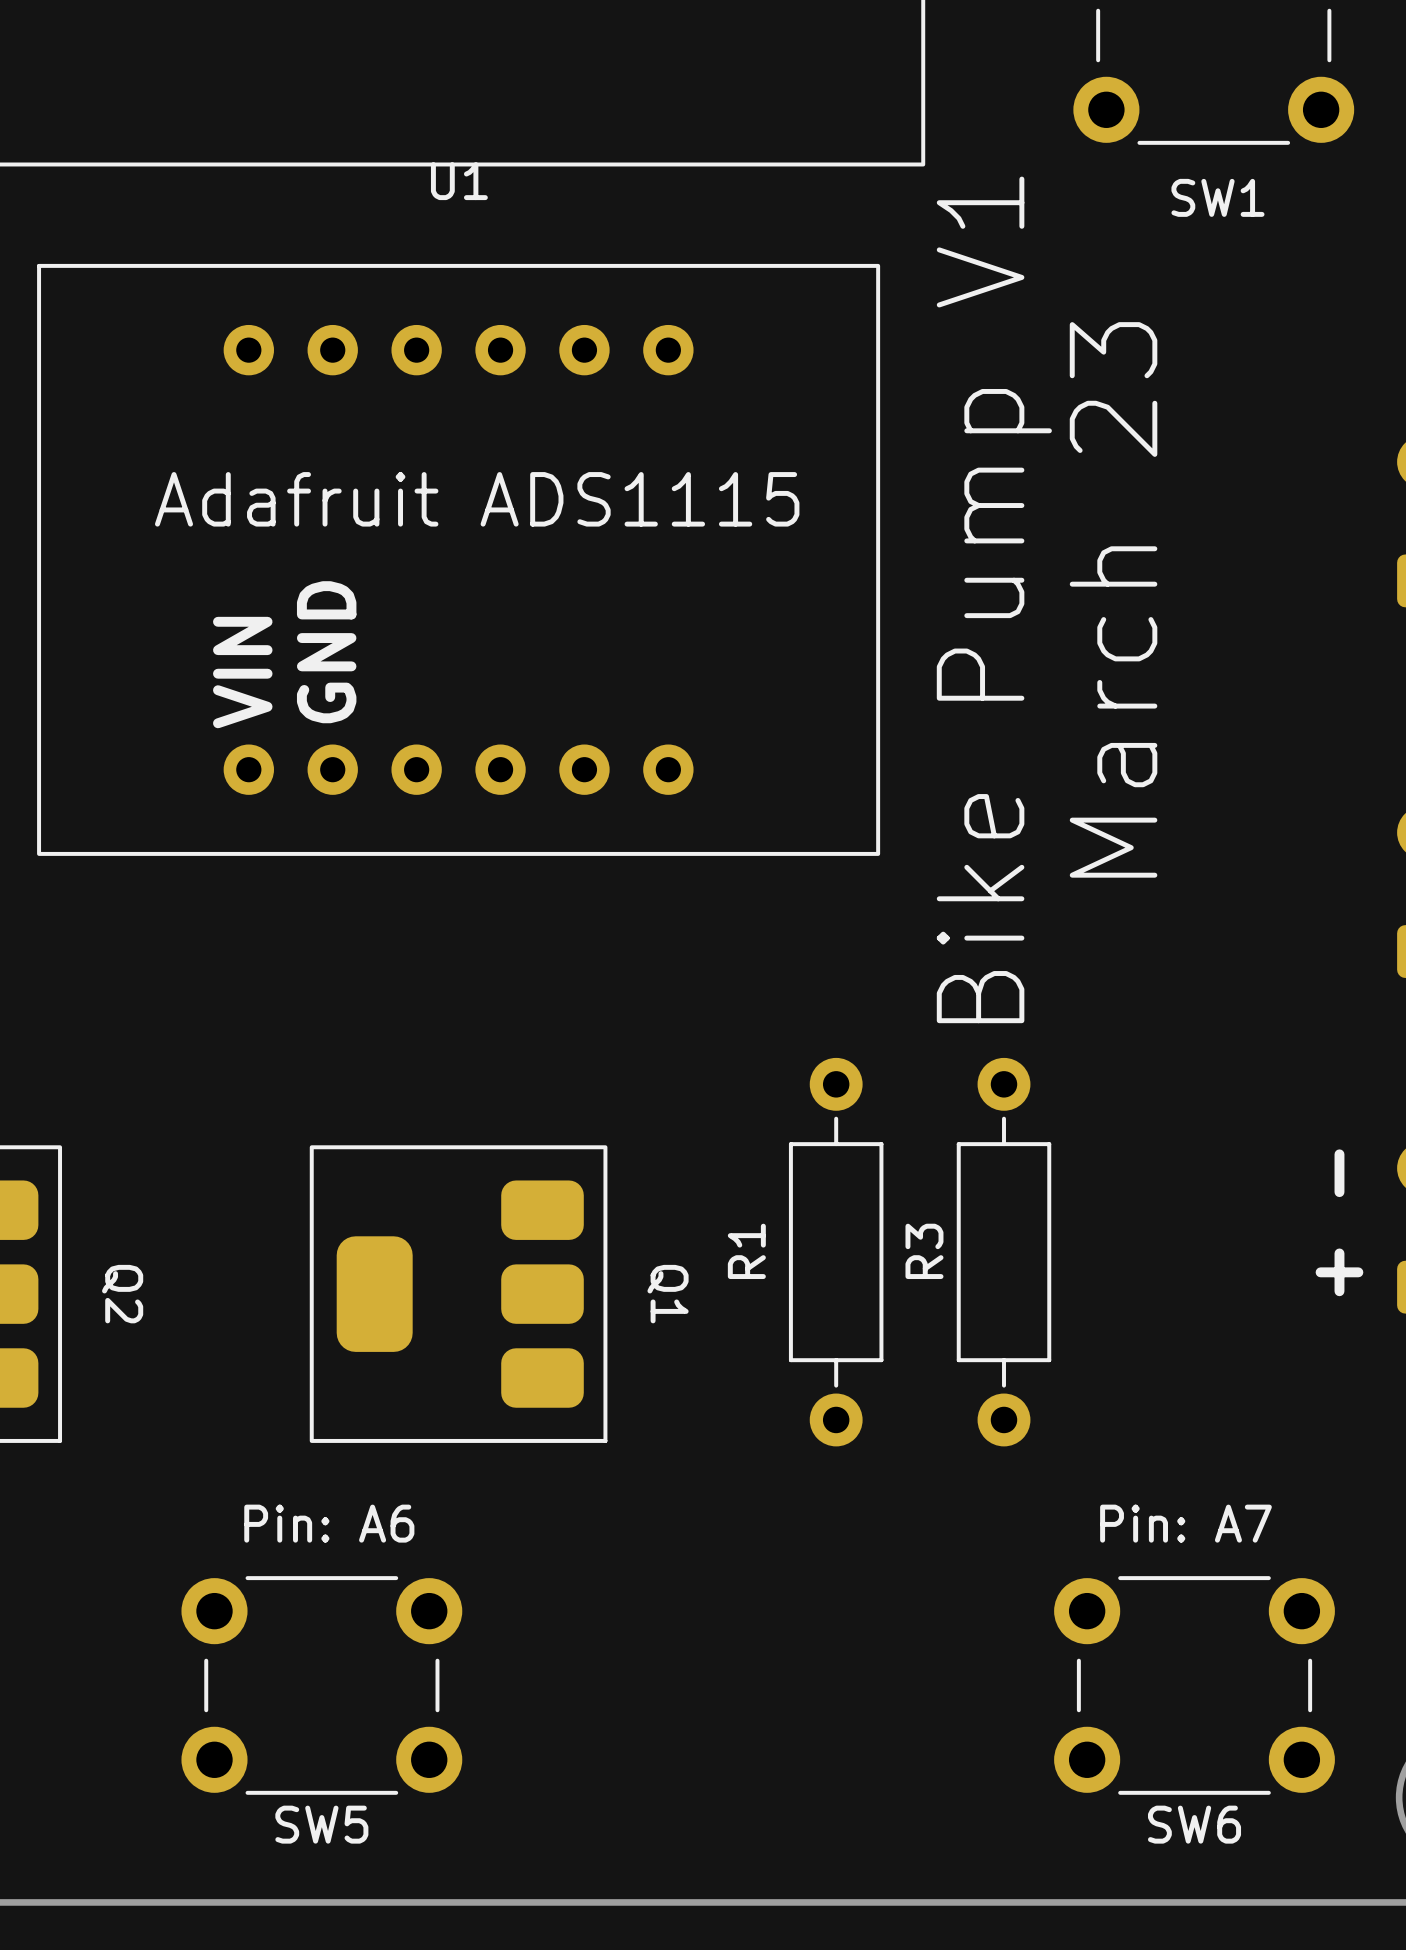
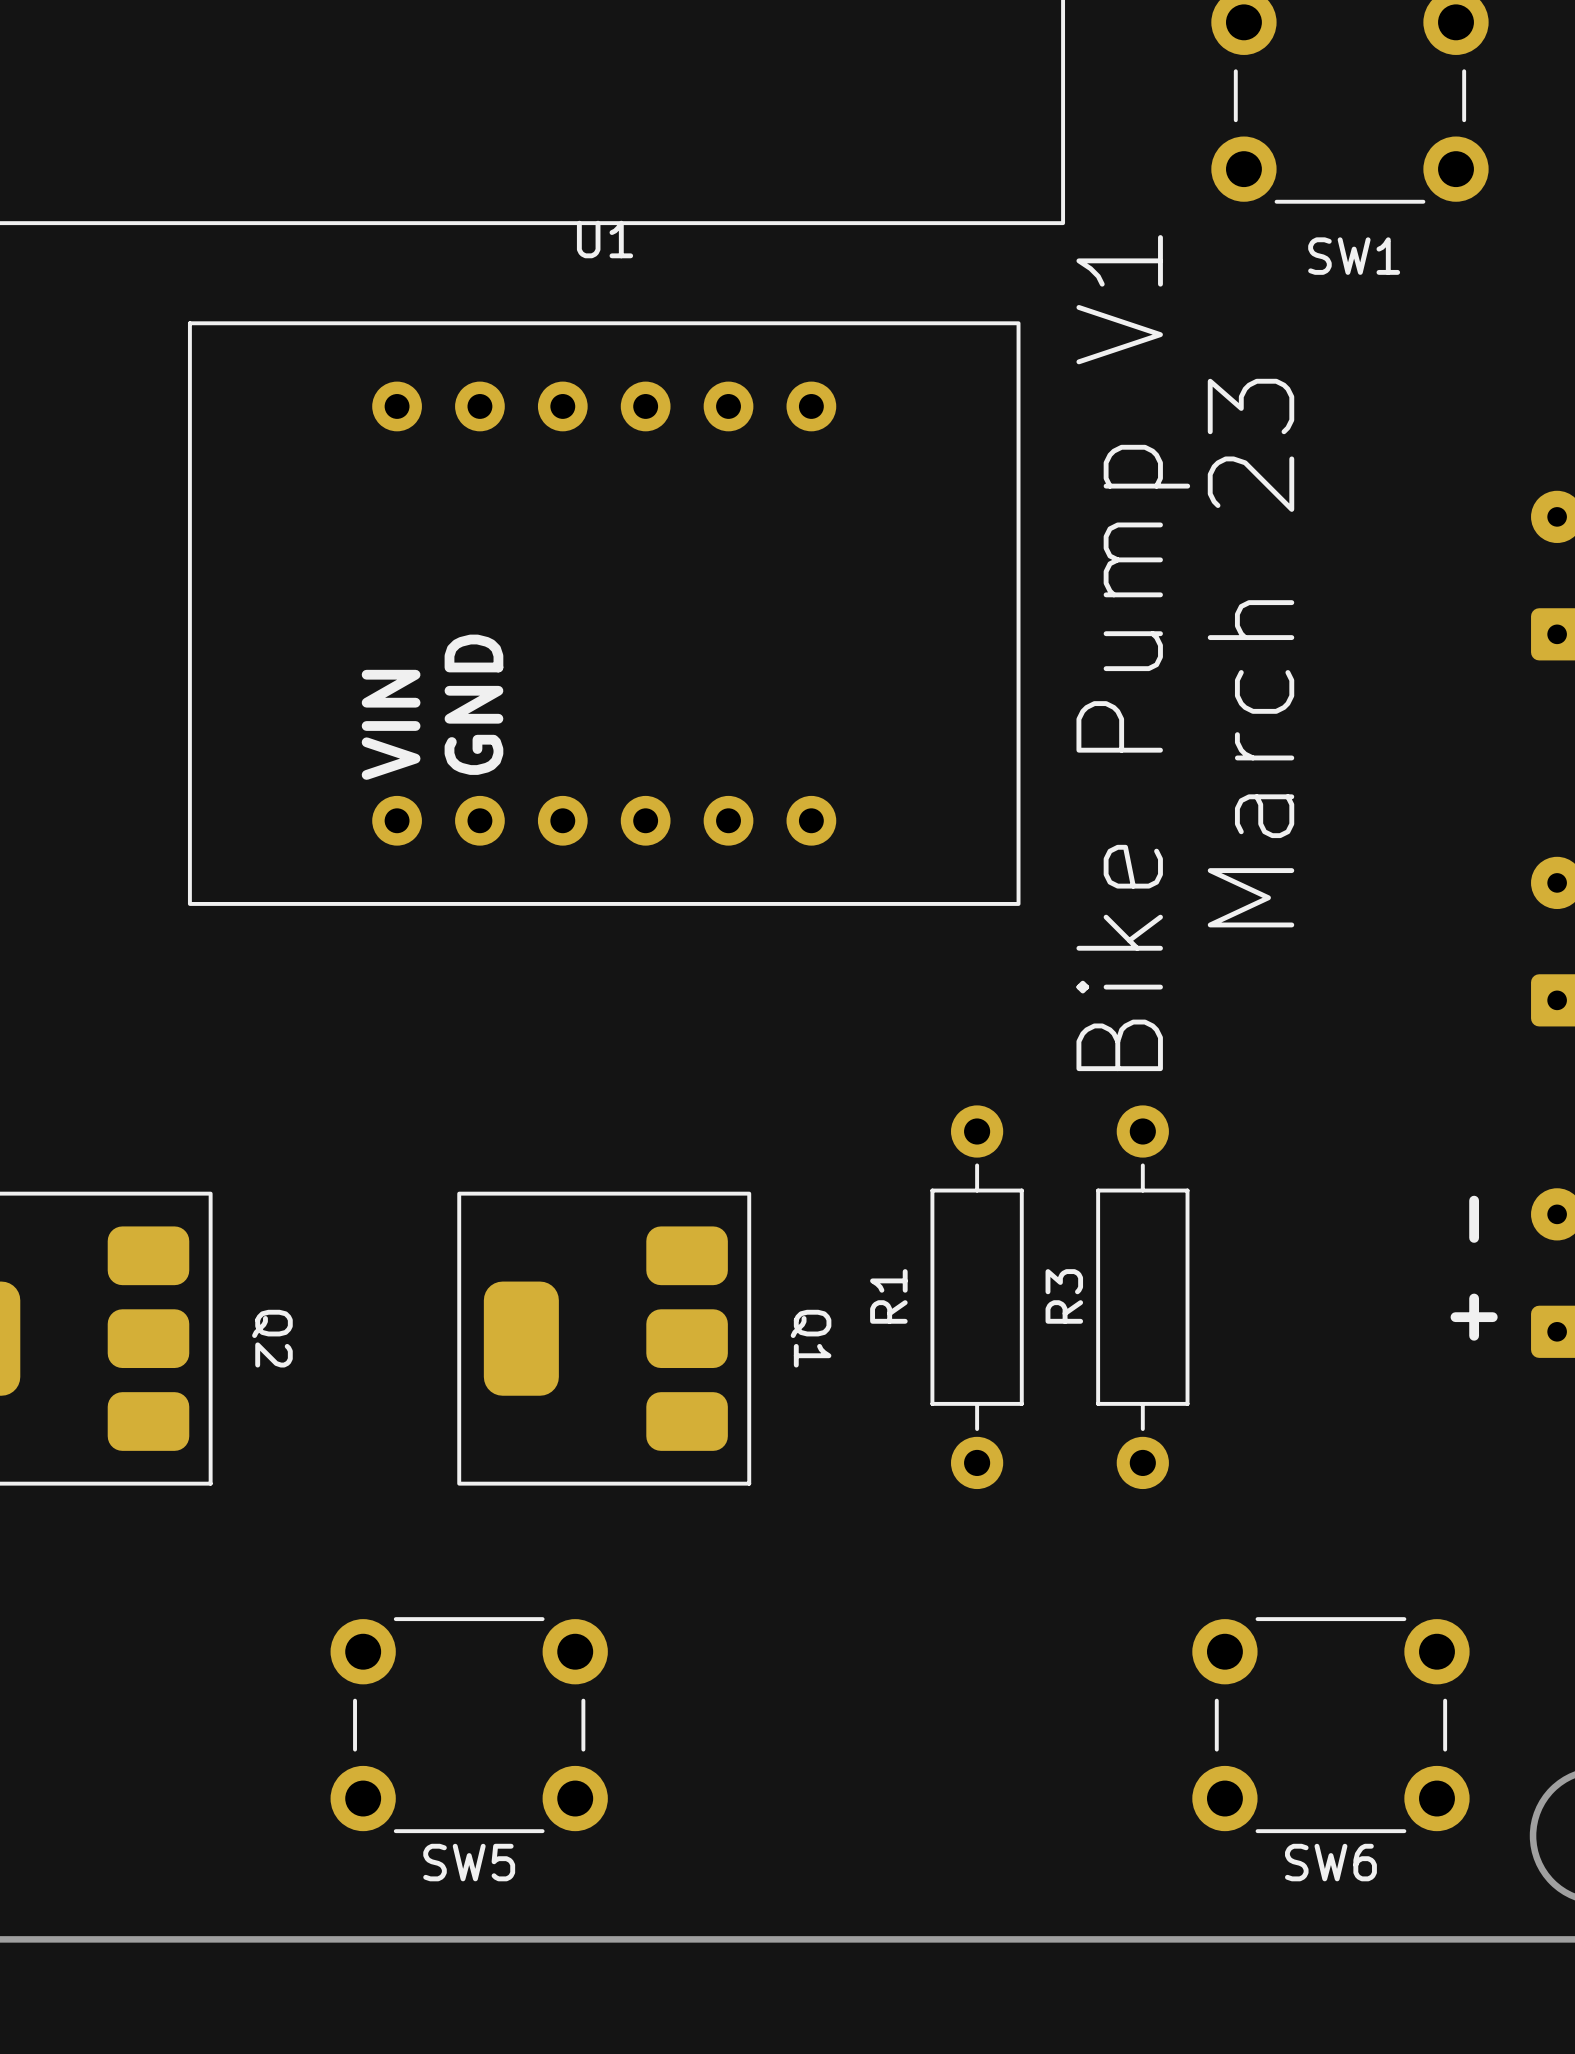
text: Adafruit ADS1115 (477, 499) -> none
text: Pin: A6 (329, 1523) -> none
text: Pin: A7 (1185, 1523) -> none

